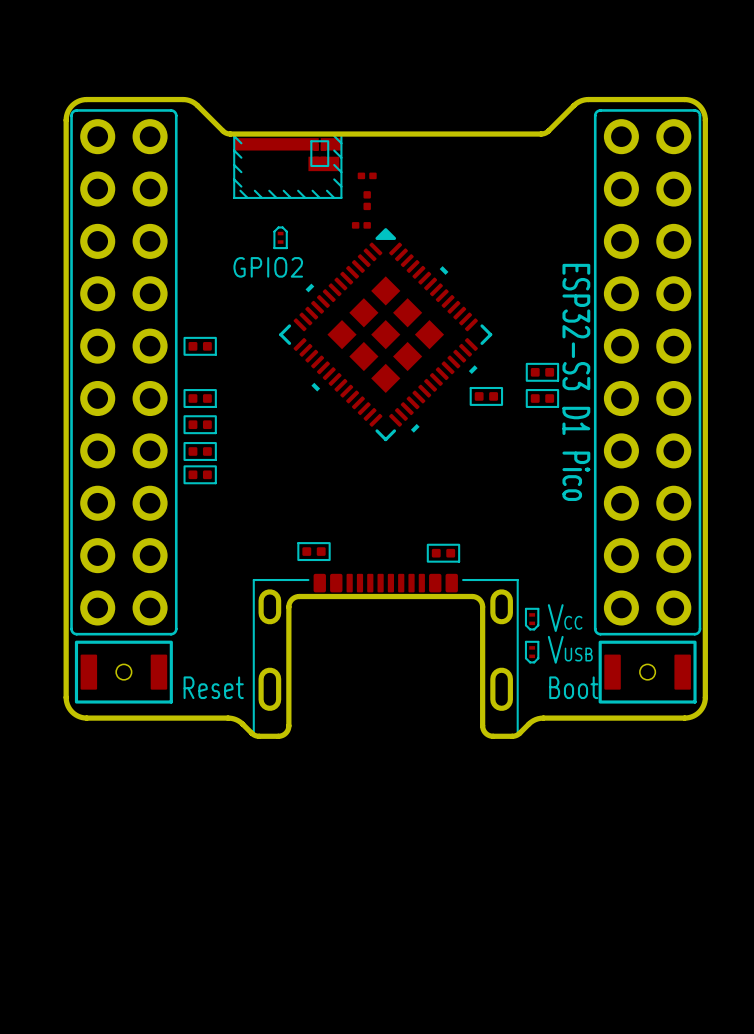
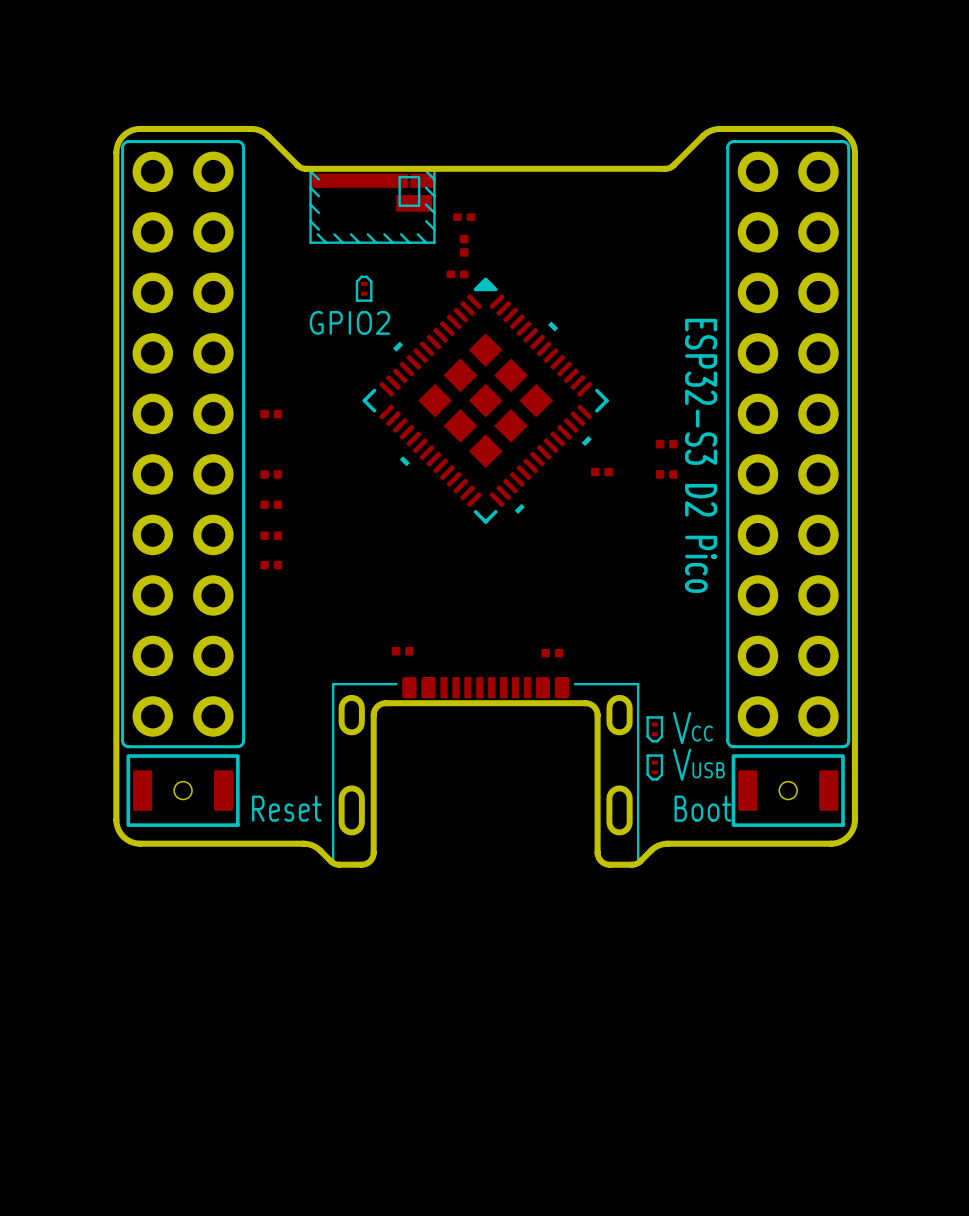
part footprint: [183, 336, 217, 356] -> [260, 409, 283, 419]
part footprint: [525, 362, 560, 382] -> [655, 439, 678, 449]
text: ESP32-S3 D1 Pico (576, 382) -> ESP32-S3 D2 Pico (701, 455)
part footprint: [469, 386, 504, 406] -> [590, 467, 613, 477]
part footprint: [183, 389, 217, 408] -> [260, 470, 283, 479]
part footprint: [525, 389, 560, 408] -> [655, 470, 678, 479]
part footprint: [183, 415, 217, 435] -> [260, 500, 283, 509]
part footprint: [183, 442, 217, 461] -> [260, 531, 283, 540]
part footprint: [183, 465, 217, 485] -> [260, 560, 283, 570]
part footprint: [297, 542, 331, 562] -> [391, 646, 414, 656]
part footprint: [426, 543, 461, 563] -> [541, 648, 564, 658]

